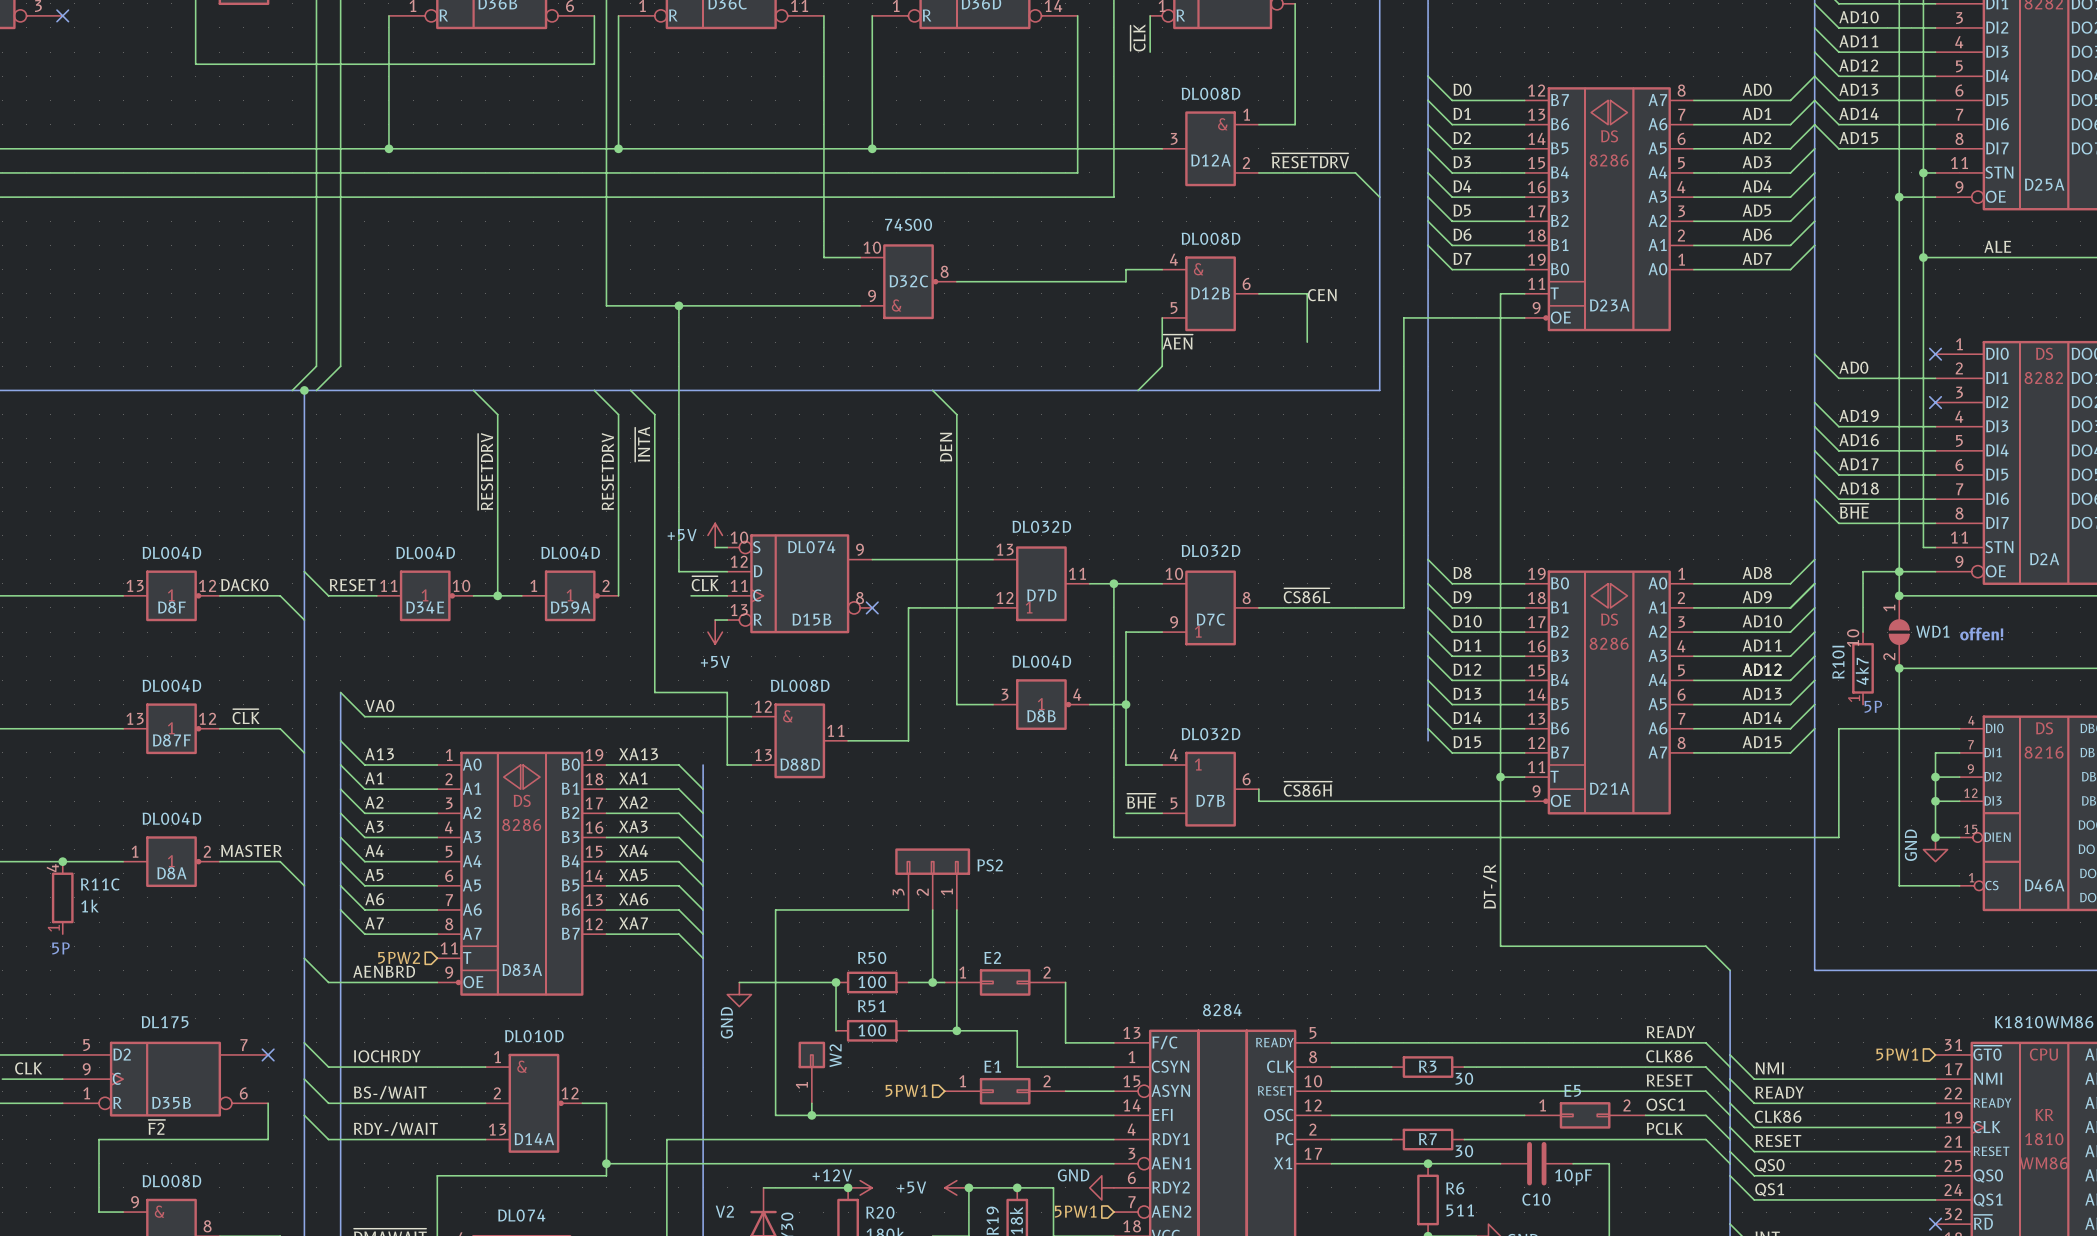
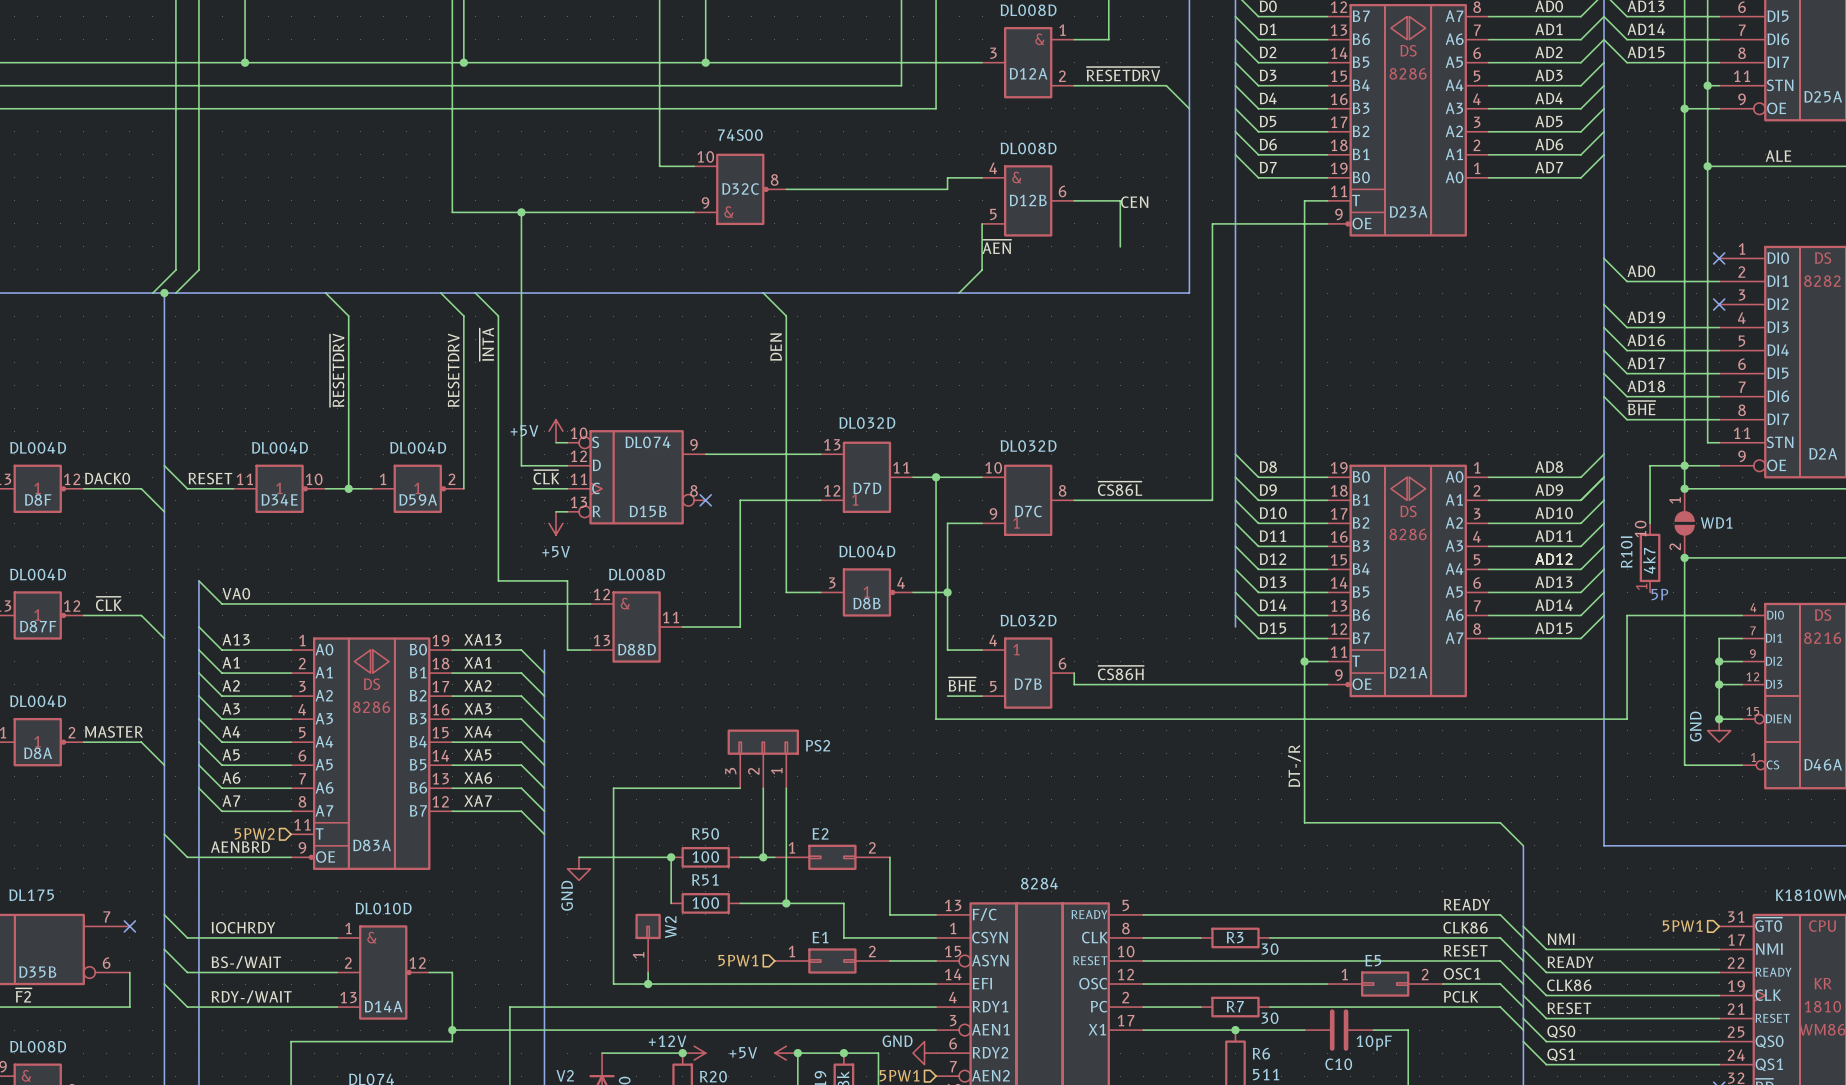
text: offen! (1981, 633) -> none

